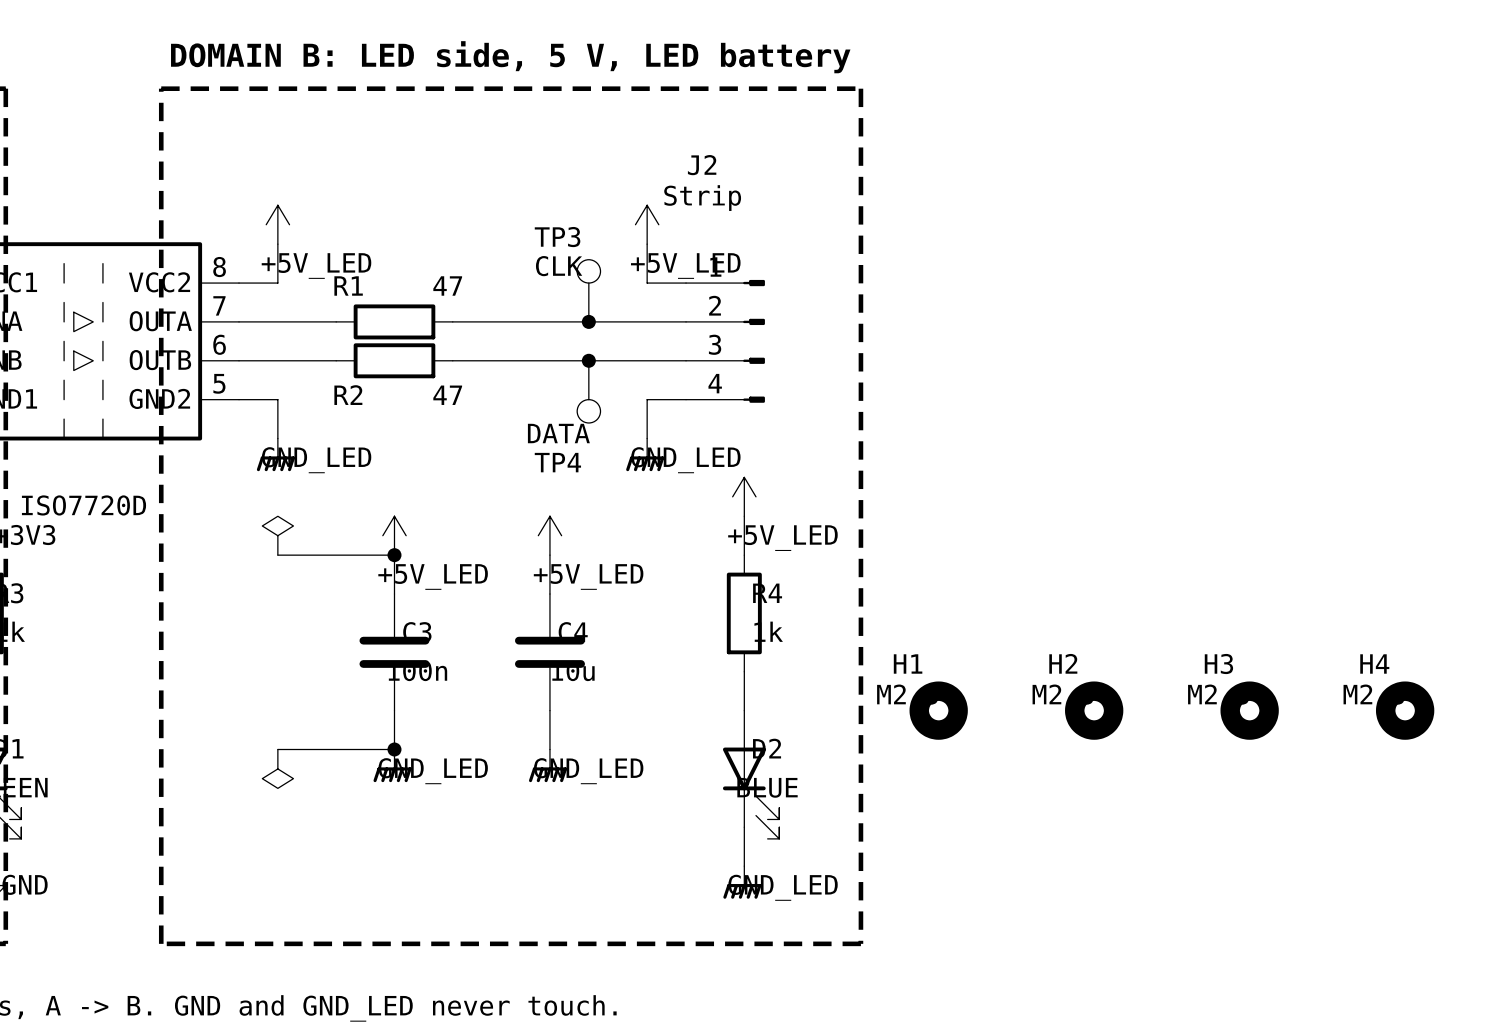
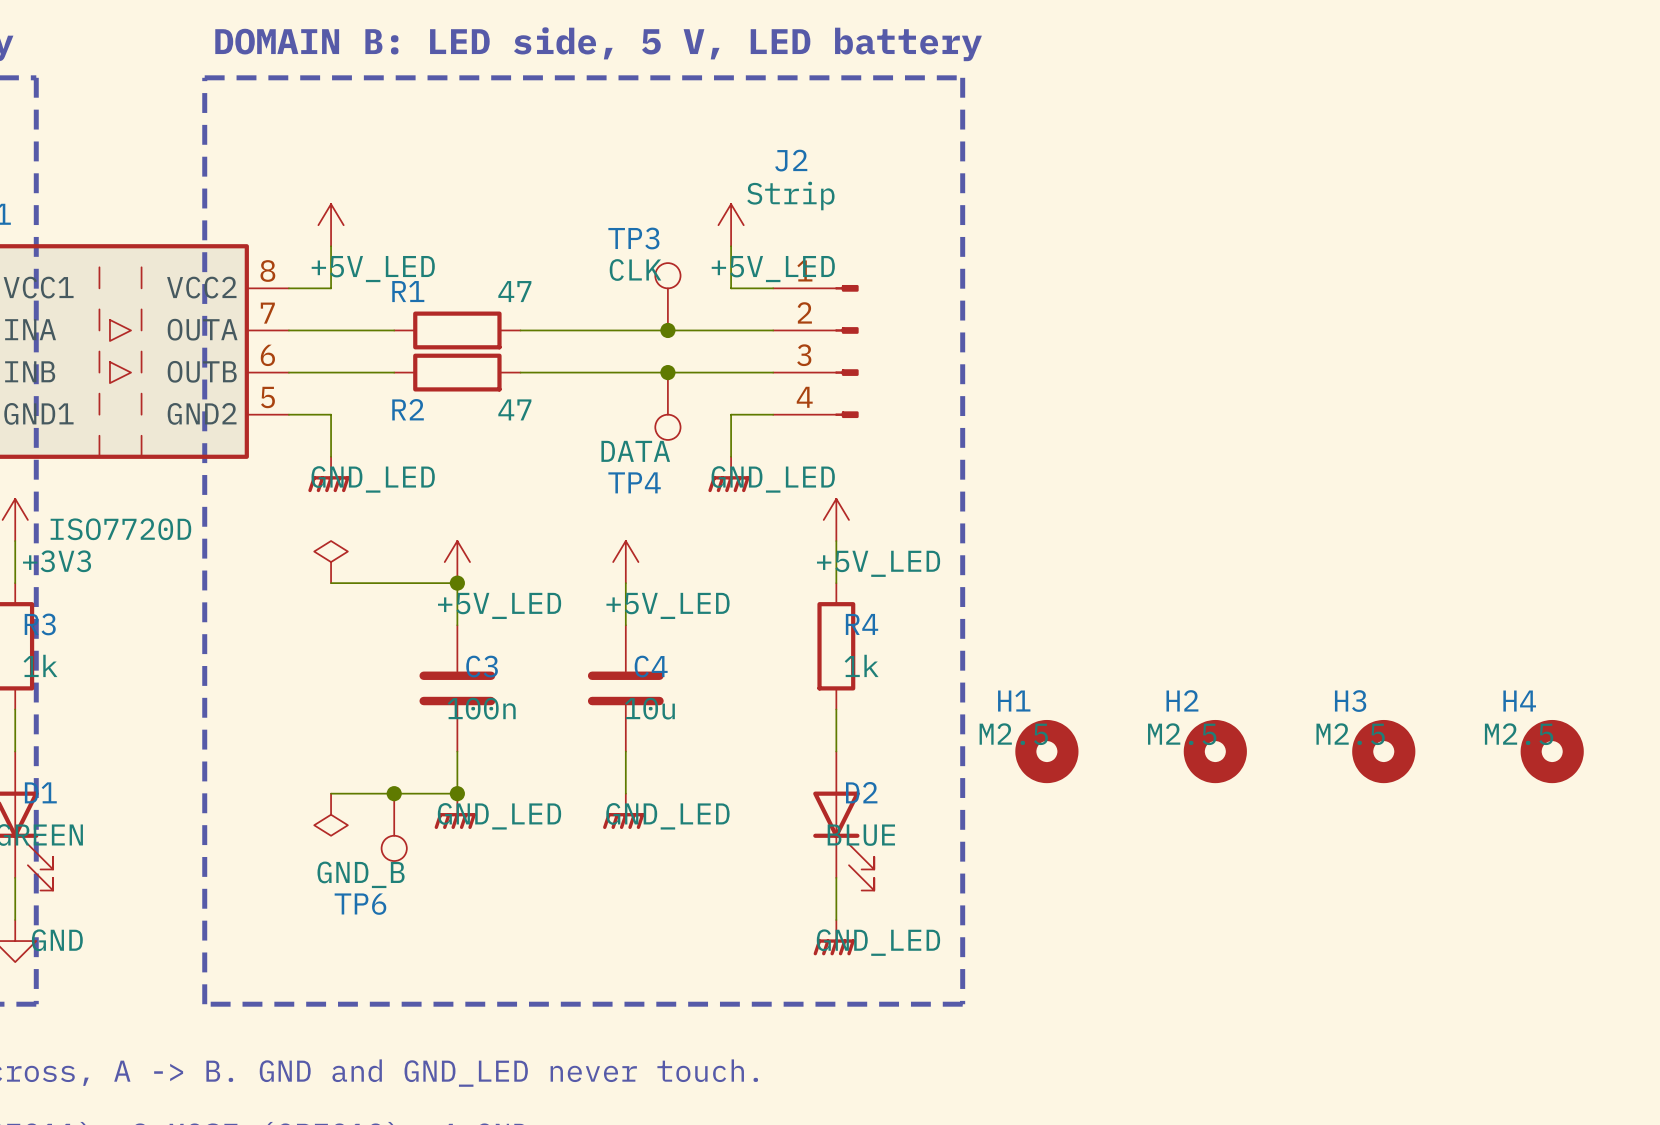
junction: none -> (394, 793)
TP6: none -> GND_B (394, 827)

